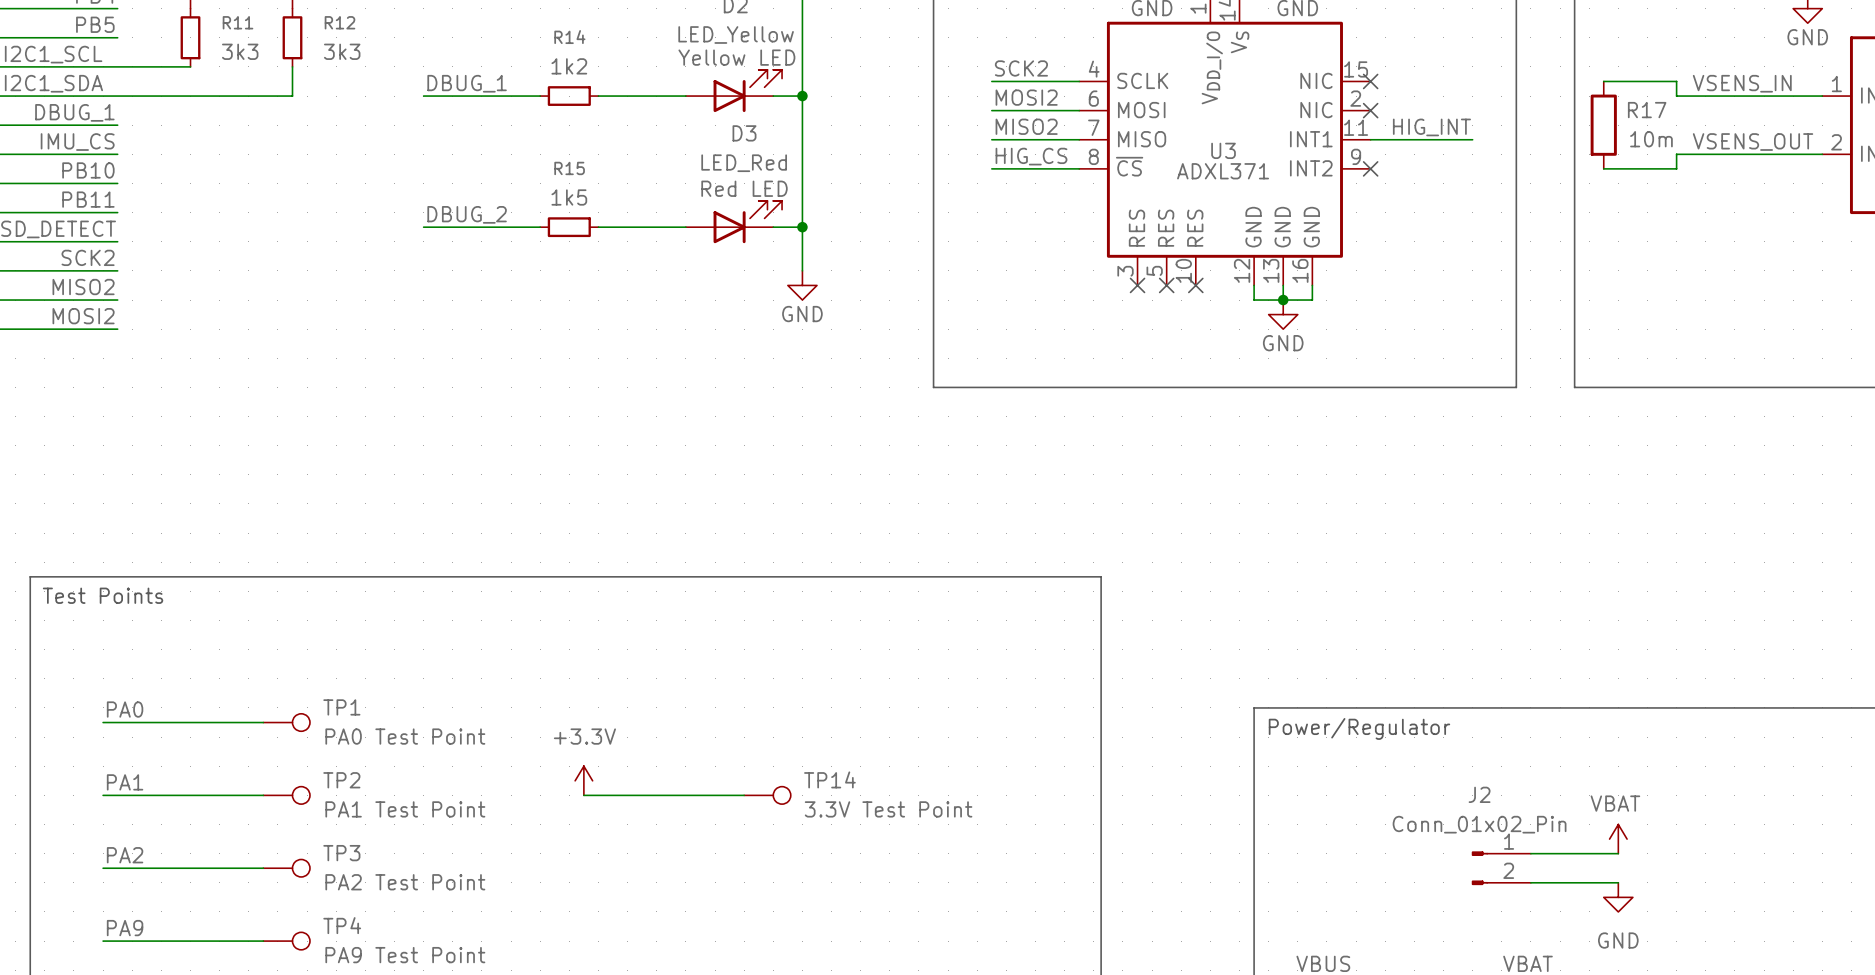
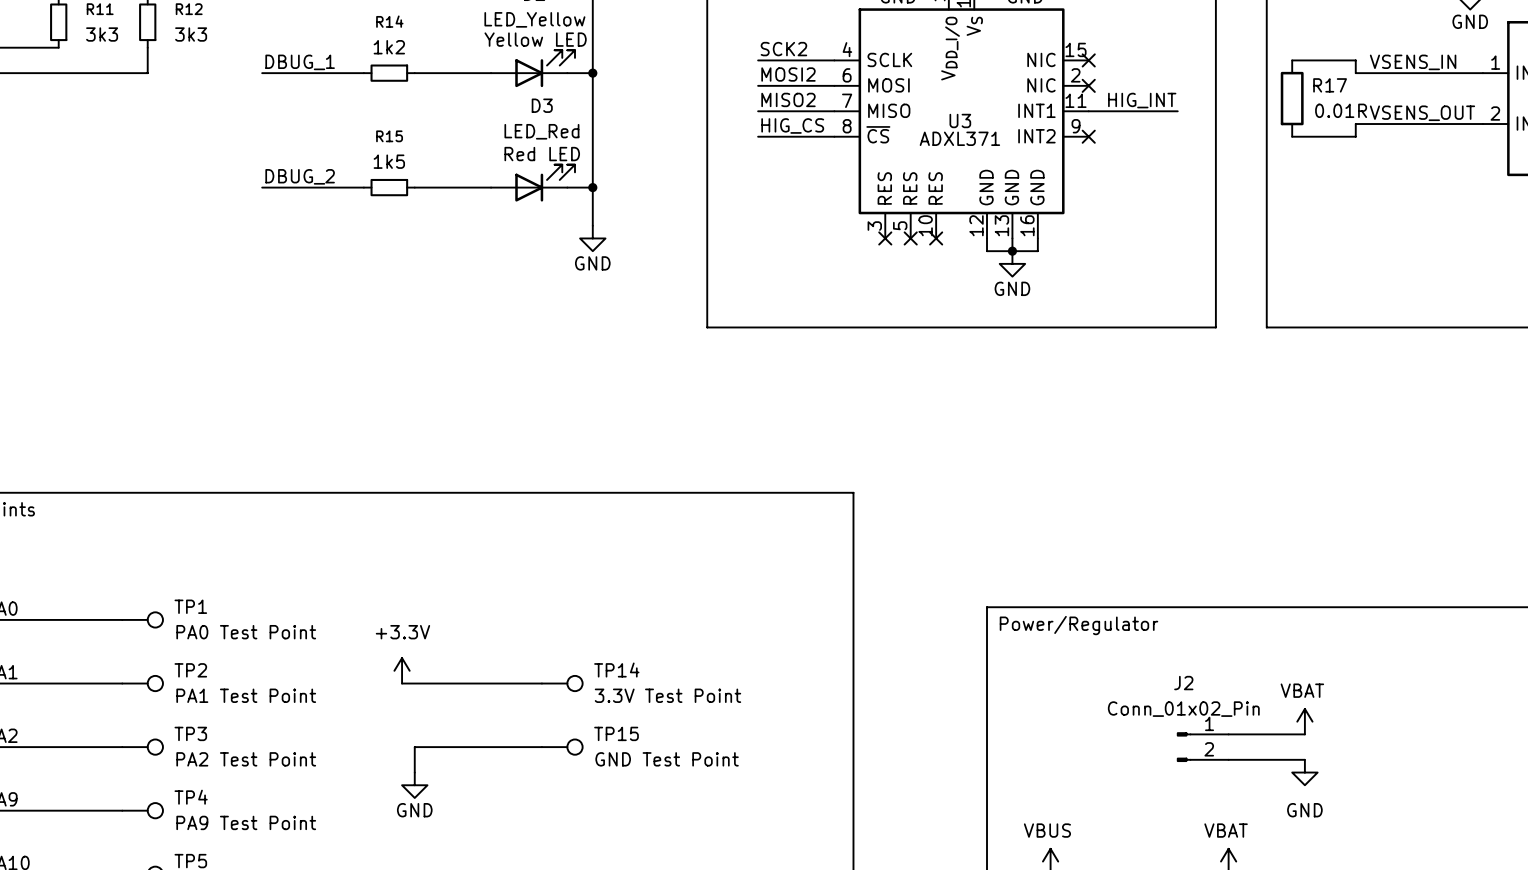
R17 value: 10m (1651, 139) -> 0.01R (1341, 110)
wire: none -> (541, 747) (414, 747) (414, 772)
TP15: none -> GND Test Point (562, 747)
power symbol: none -> GND (414, 785)

